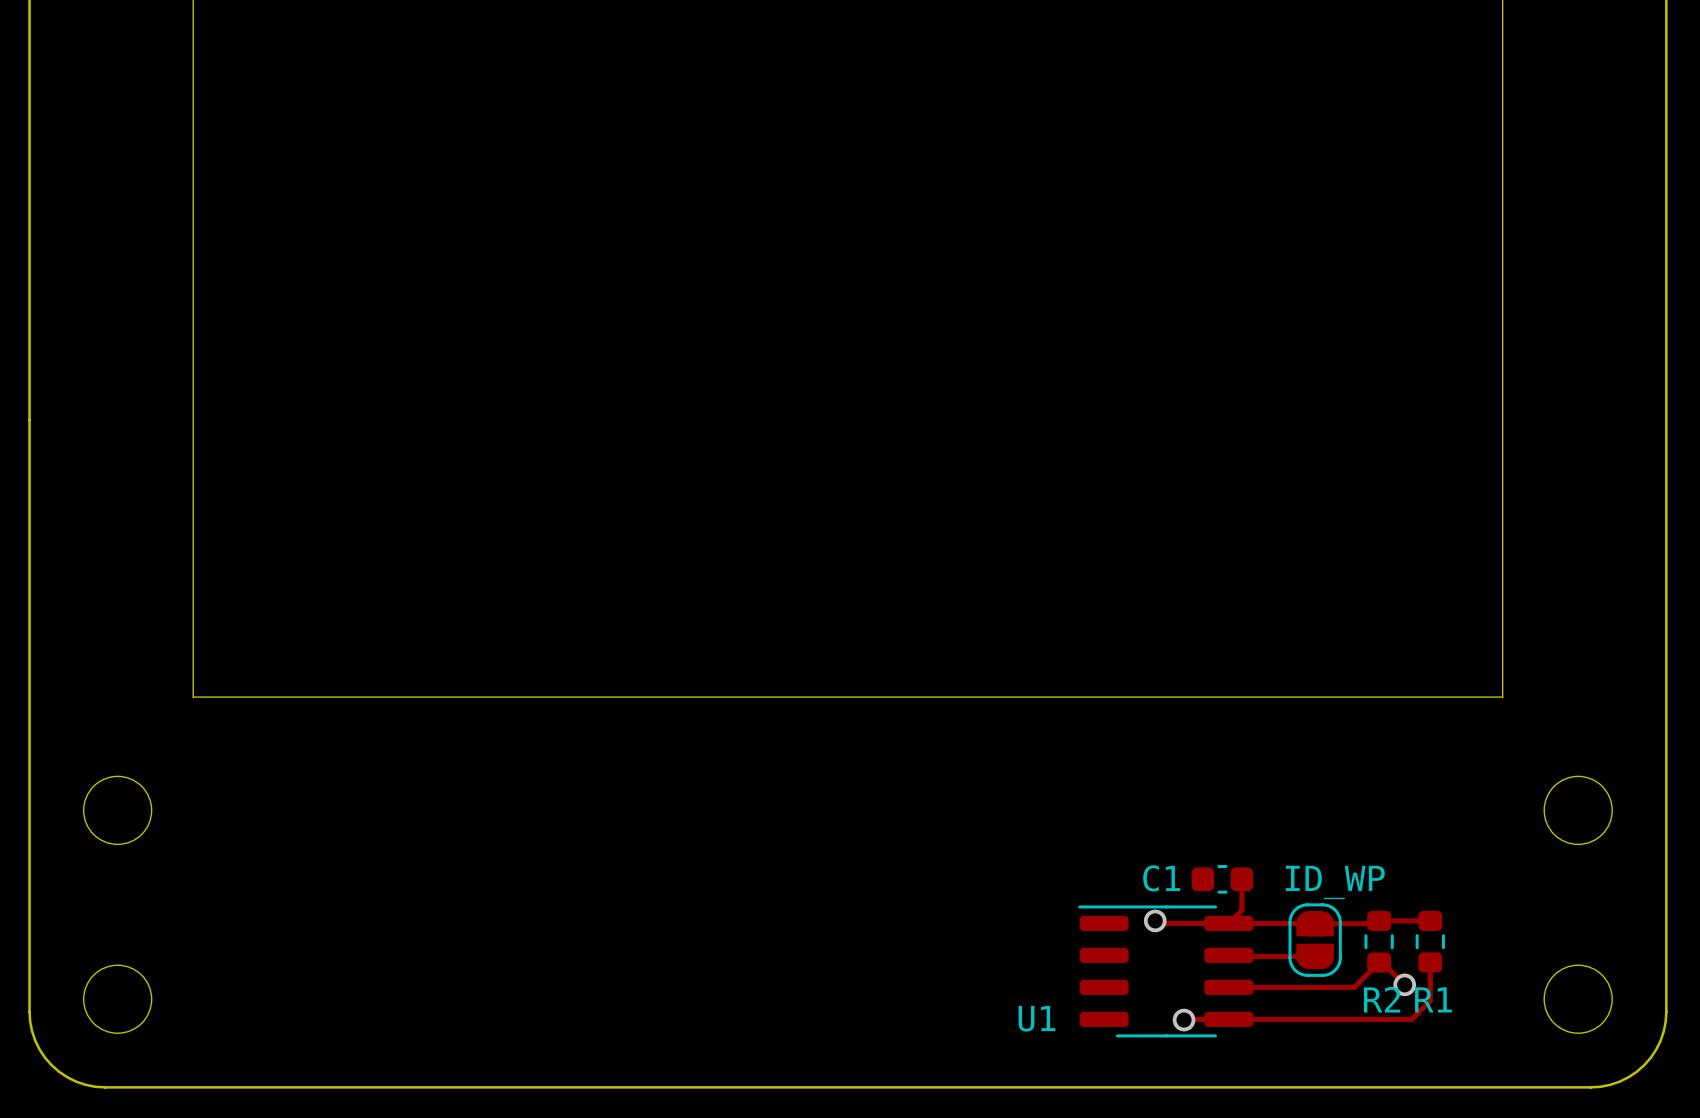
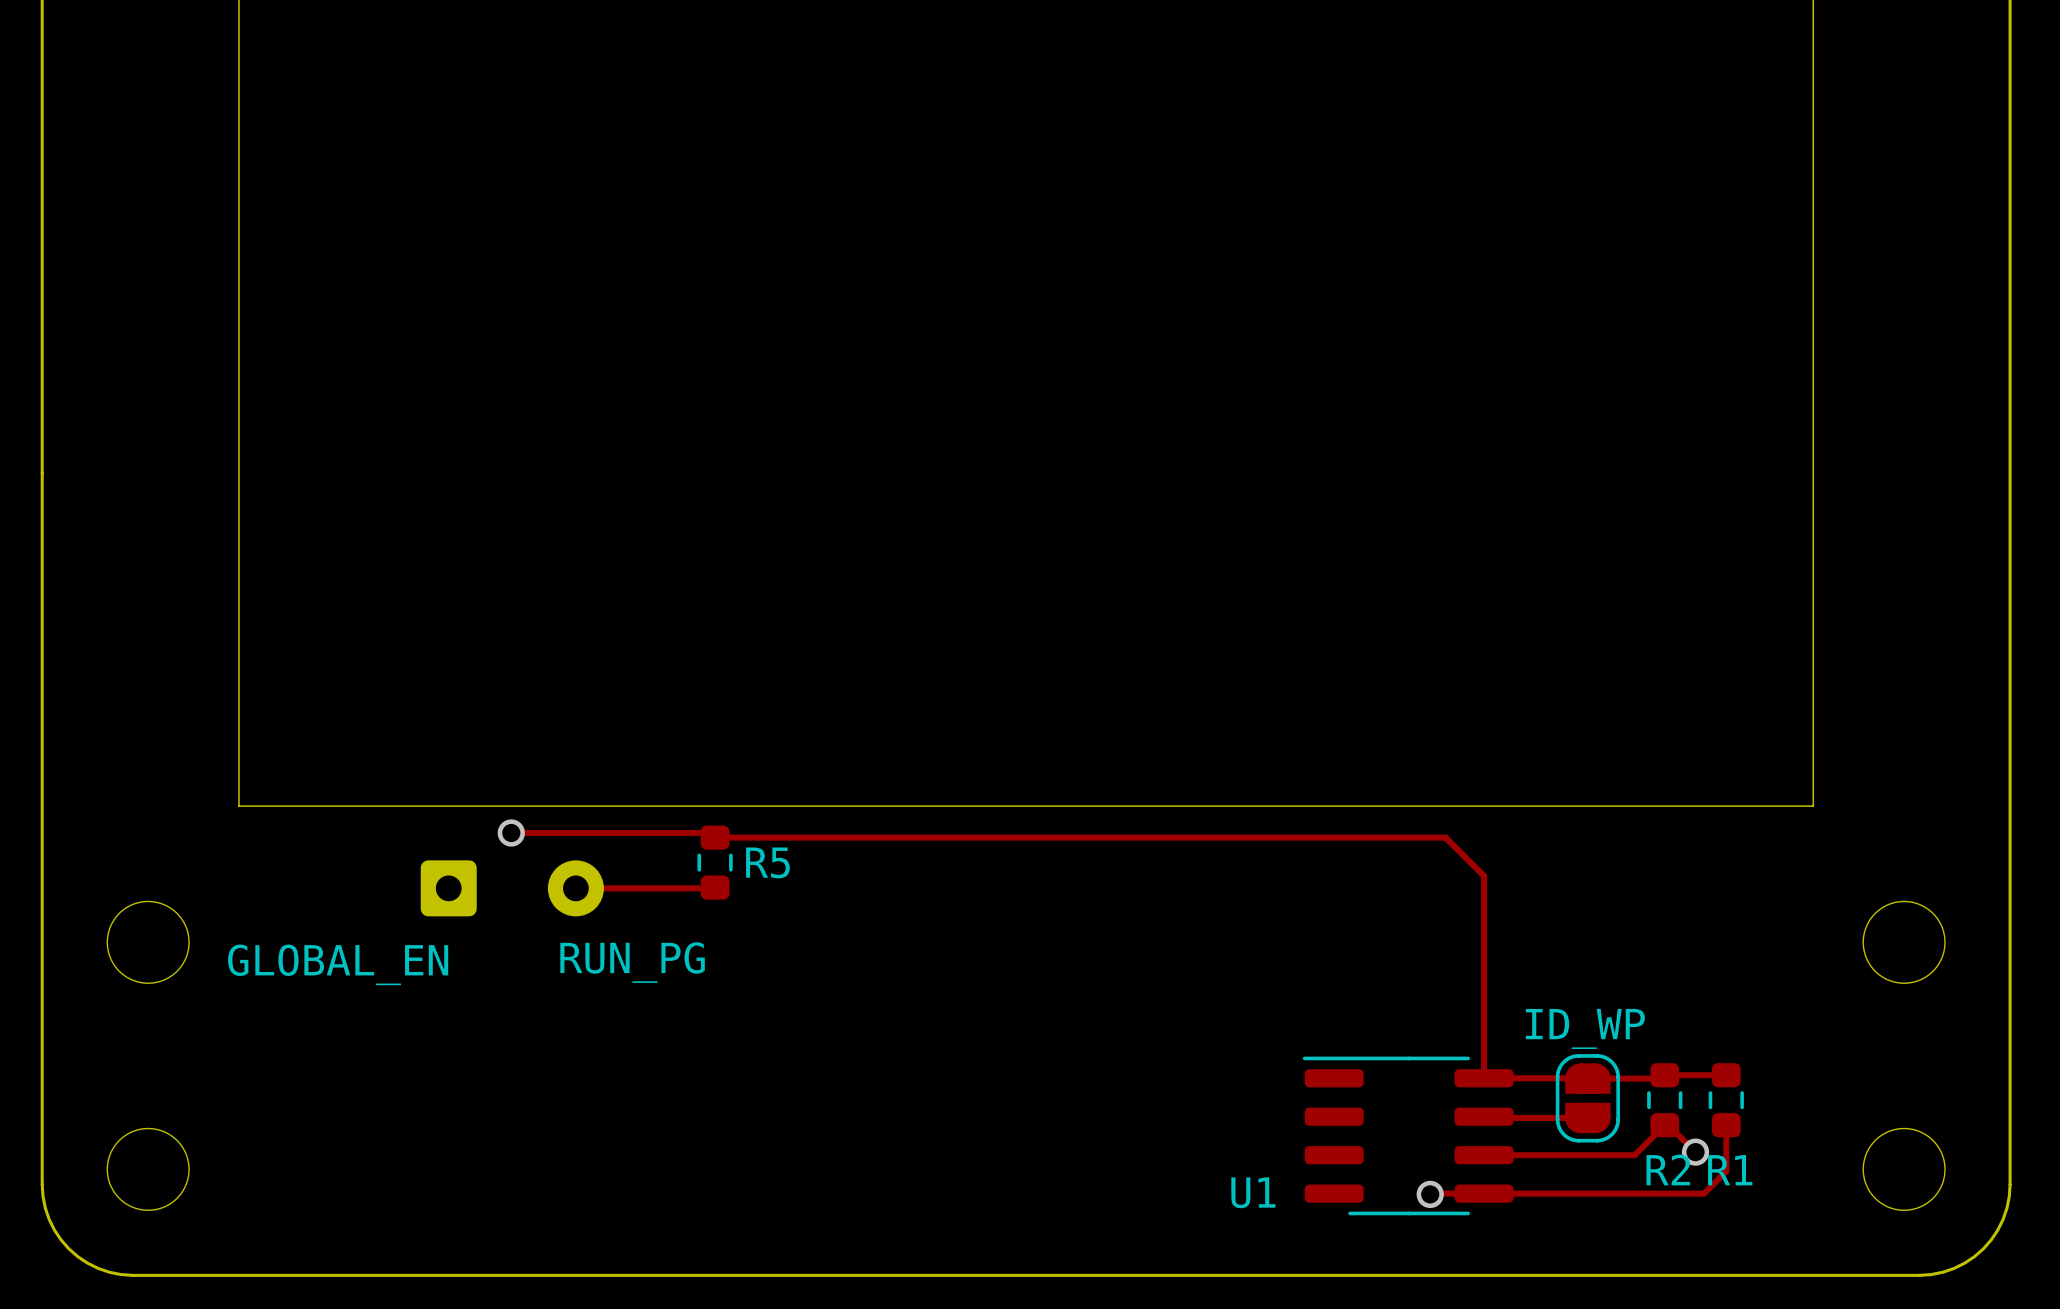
track: none -> (511, 832) (710, 832) (715, 837)
via: none -> (511, 832)
track: none -> (715, 837) (1445, 837) (1484, 876) (1484, 1078)
R5: none -> (715, 862)
track: none -> (576, 887) (715, 887)
part: none -> (512, 888)
text: none -> RUN_PG (632, 962)
text: none -> GLOBAL_EN (338, 964)
C1: (1222, 879) -> none
track: (1241, 879) (1241, 910) (1228, 923) (1157, 923) (1155, 920) -> none
text: none -> ID_WP (1585, 1028)
part value: ID_WP (1335, 882) -> none
via: (1155, 920) -> none

